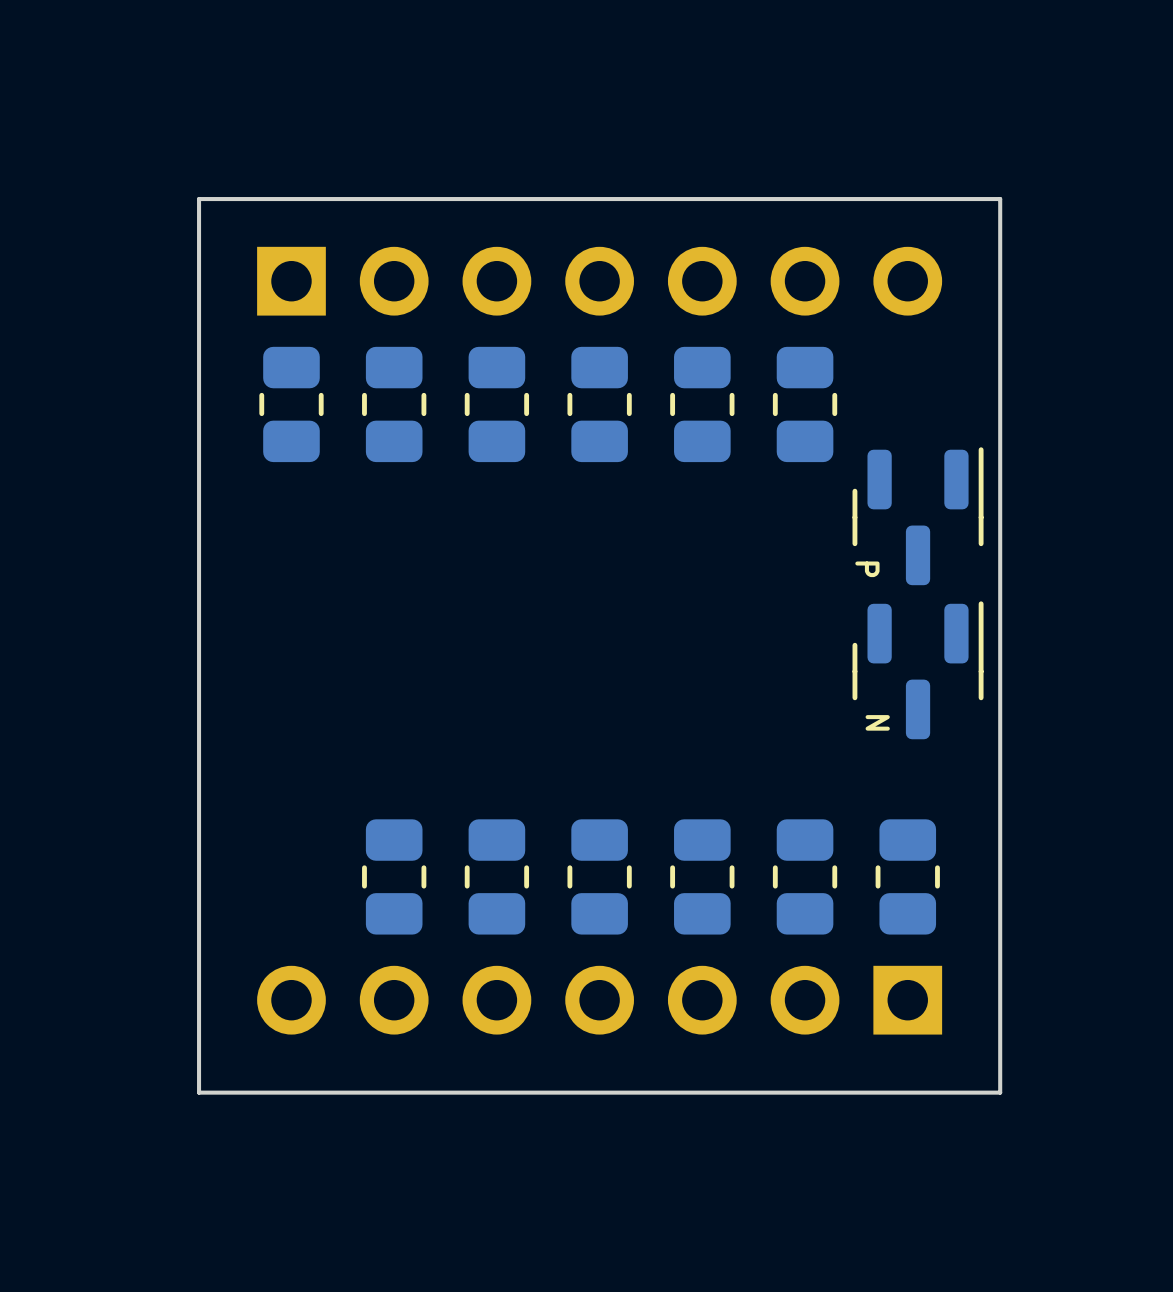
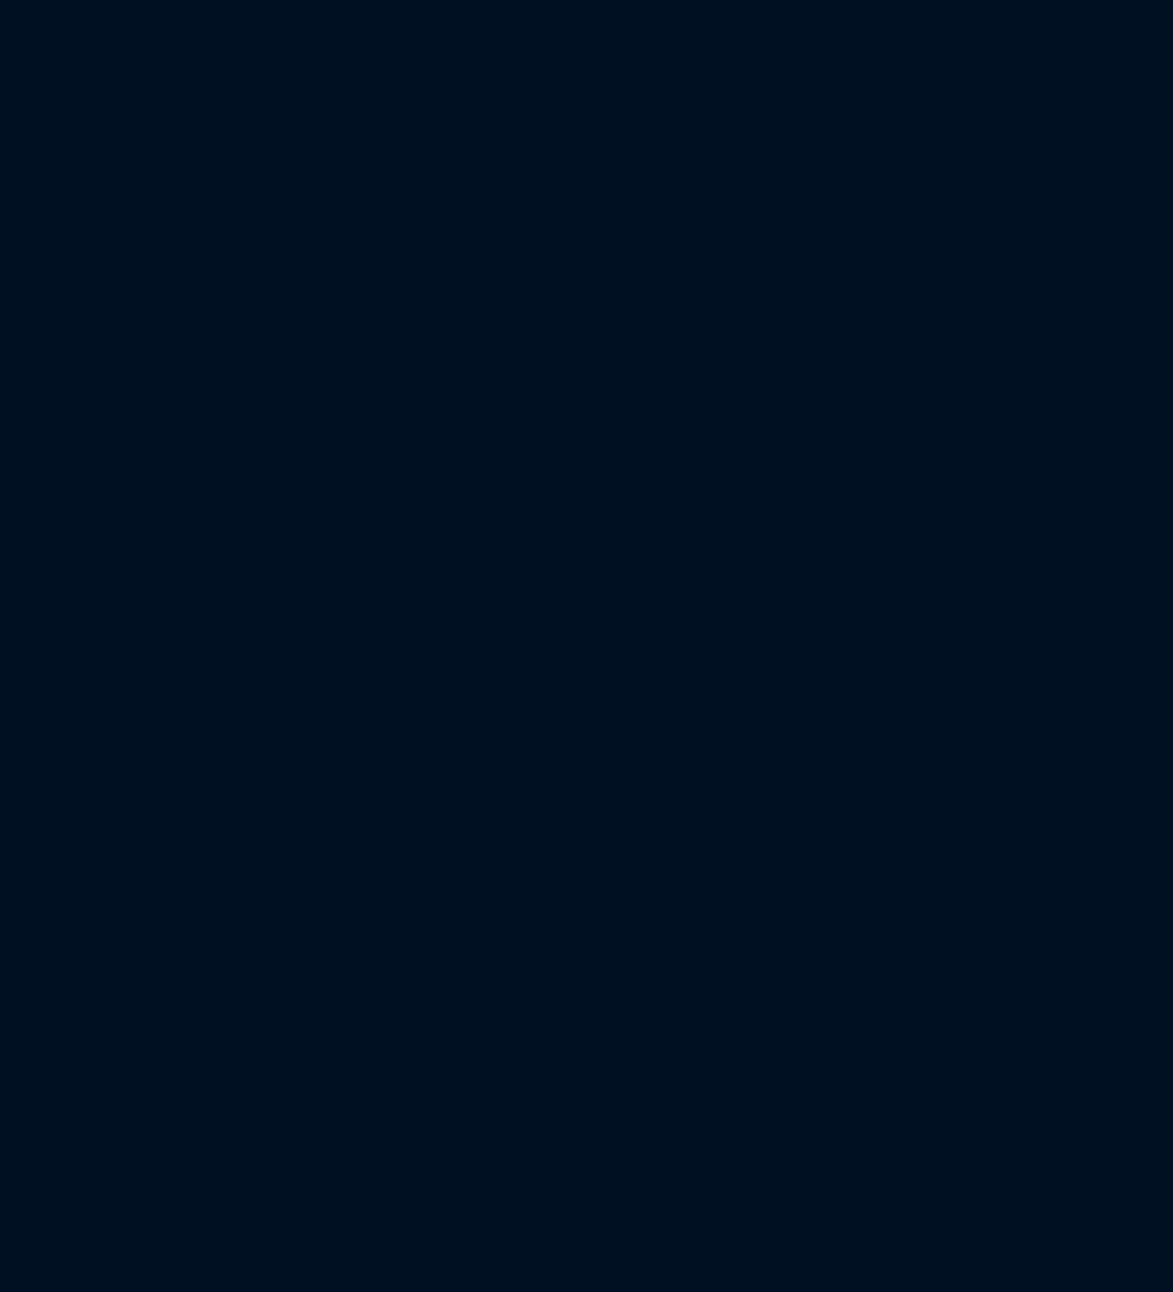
board edge: (1000, 199) (199, 199) (199, 1092) (1000, 1092) (1000, 199) -> none
part: (599, 281) -> none
part: (291, 404) -> none
part: (394, 404) -> none
part: (496, 404) -> none
part: (599, 404) -> none
part: (702, 404) -> none
part: (805, 404) -> none
part: P (918, 516) -> none
part: N (918, 670) -> none
part: (394, 876) -> none
part: (496, 876) -> none
part: (599, 876) -> none
part: (702, 876) -> none
part: (805, 876) -> none
part: (907, 876) -> none
part: (599, 1000) -> none

